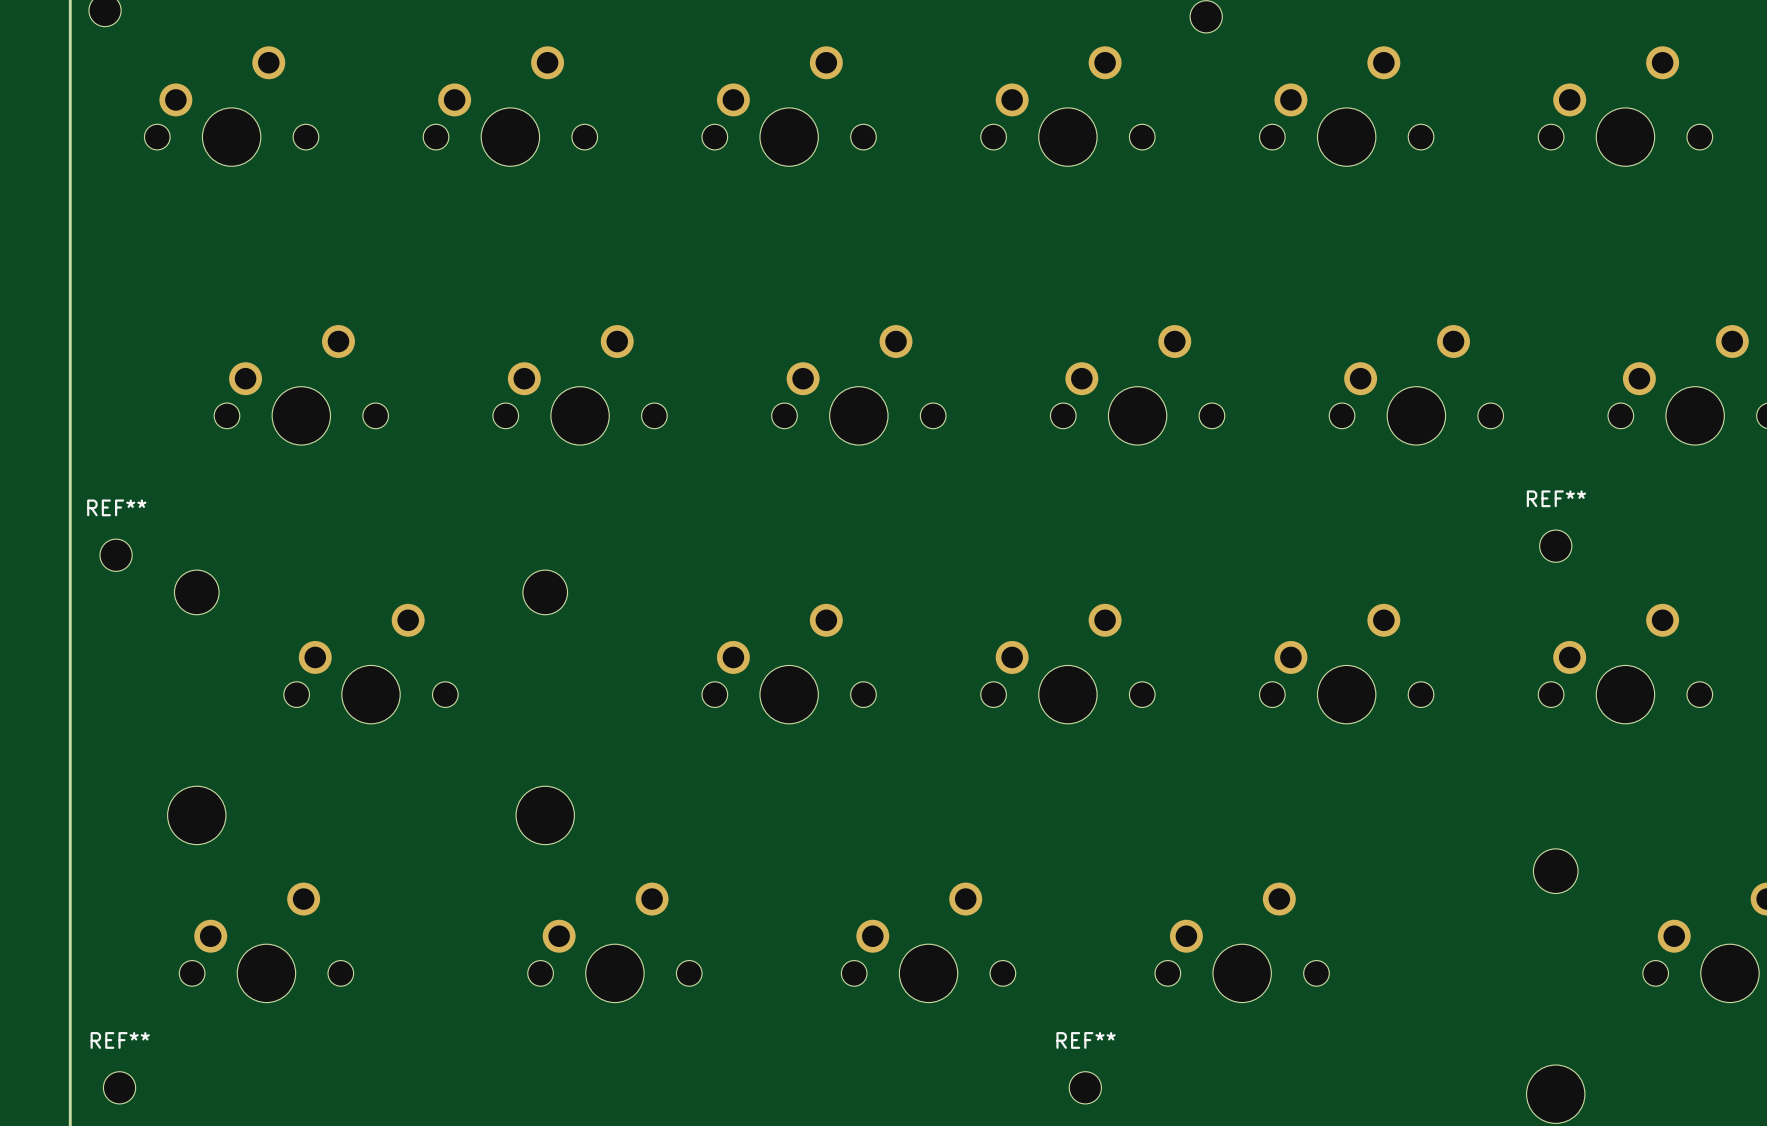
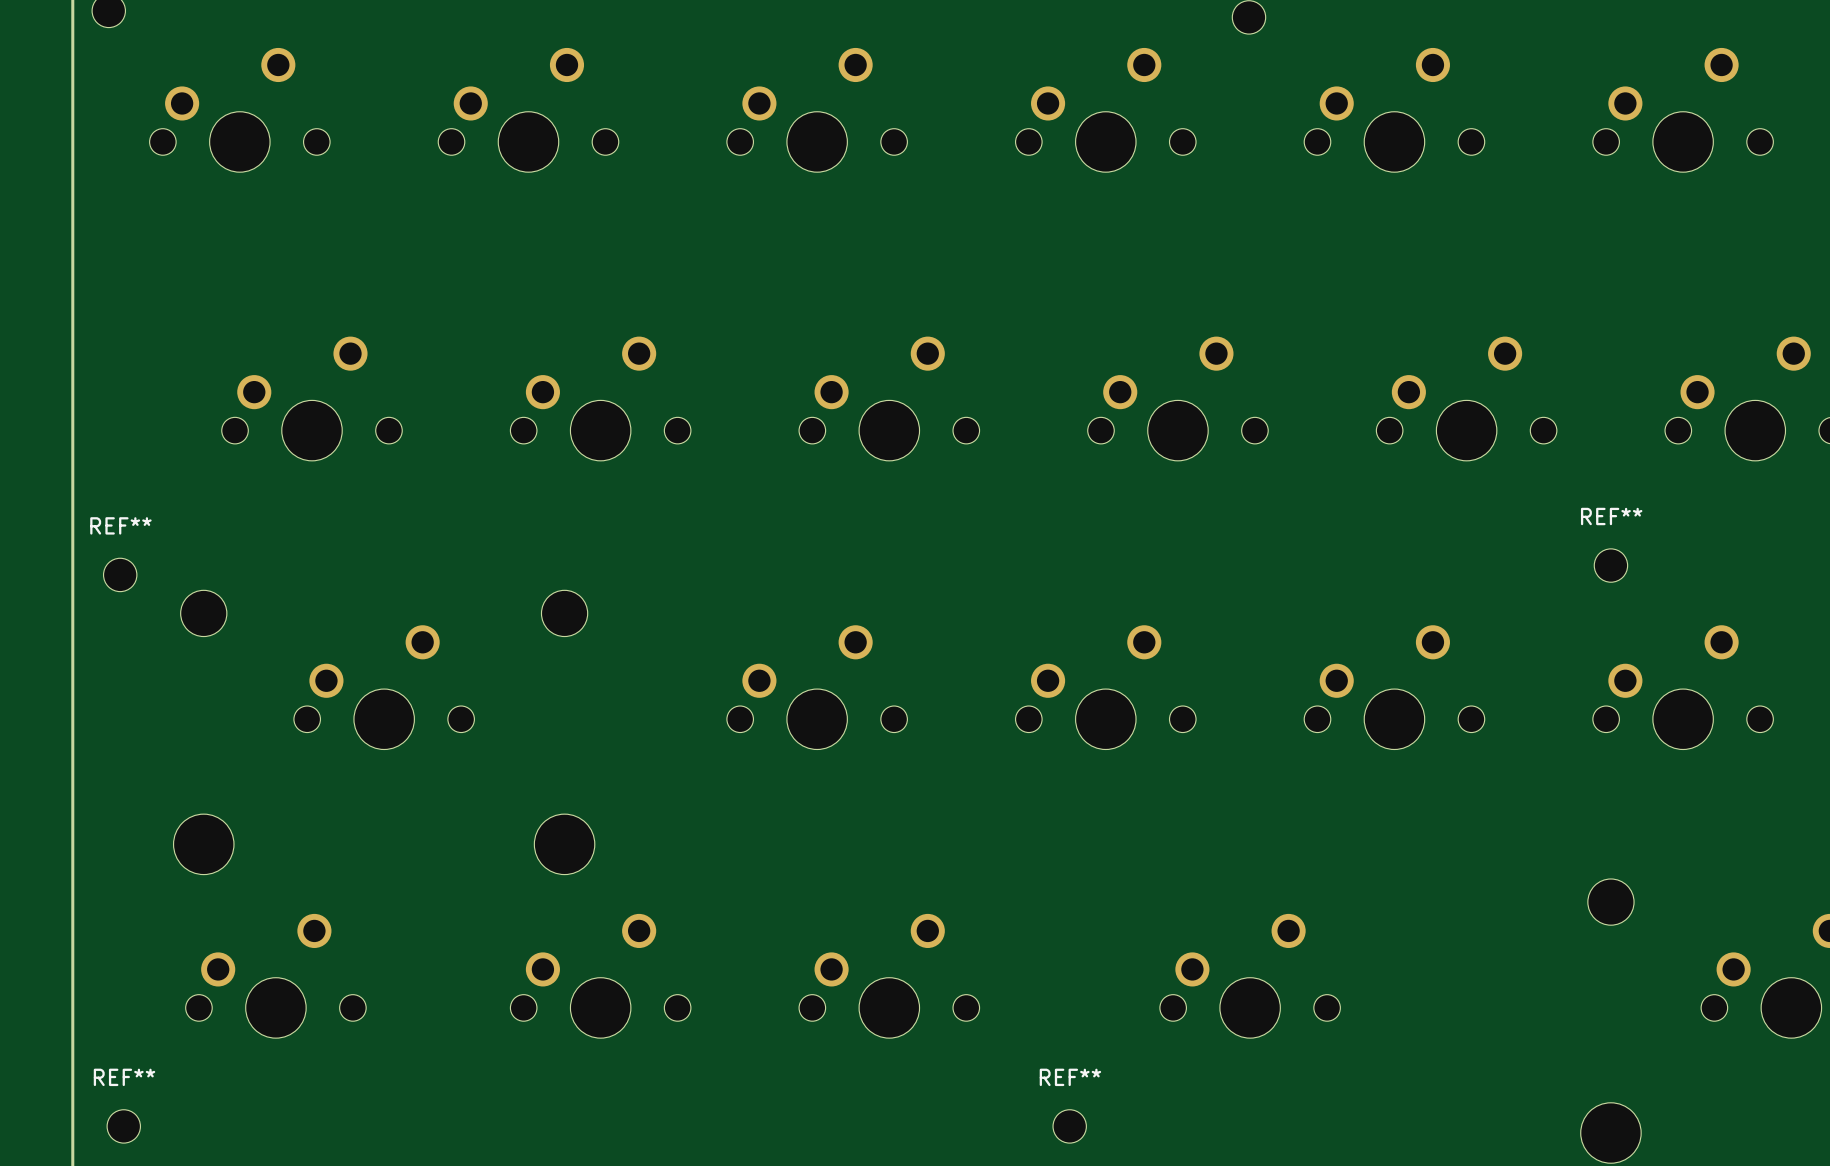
part position: (614, 942) -> (600, 976)
part position: (928, 942) -> (889, 976)
part position: (1242, 942) -> (1250, 976)
REF** position: (1085, 1087) -> (1069, 1126)

